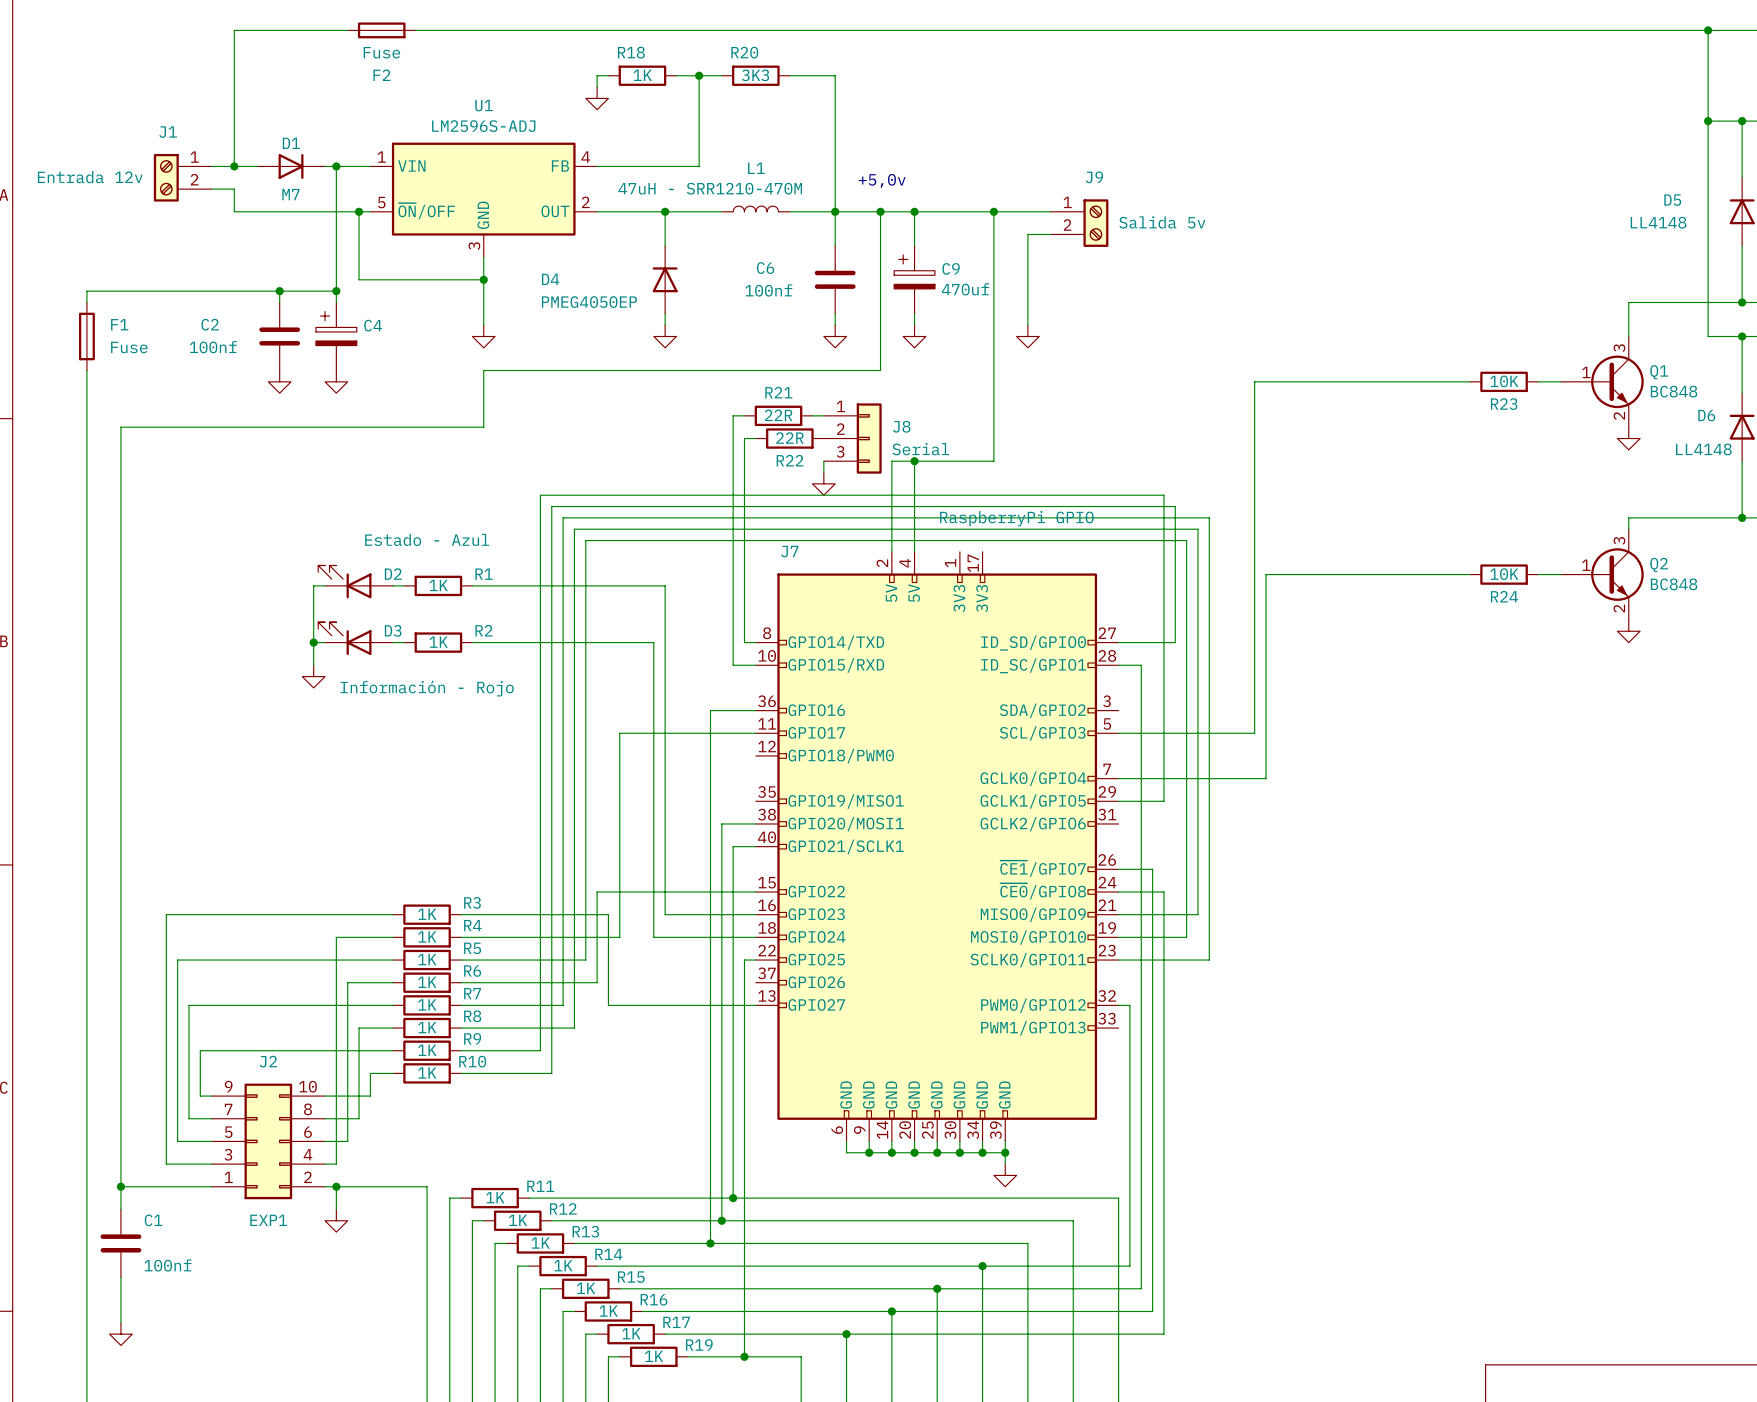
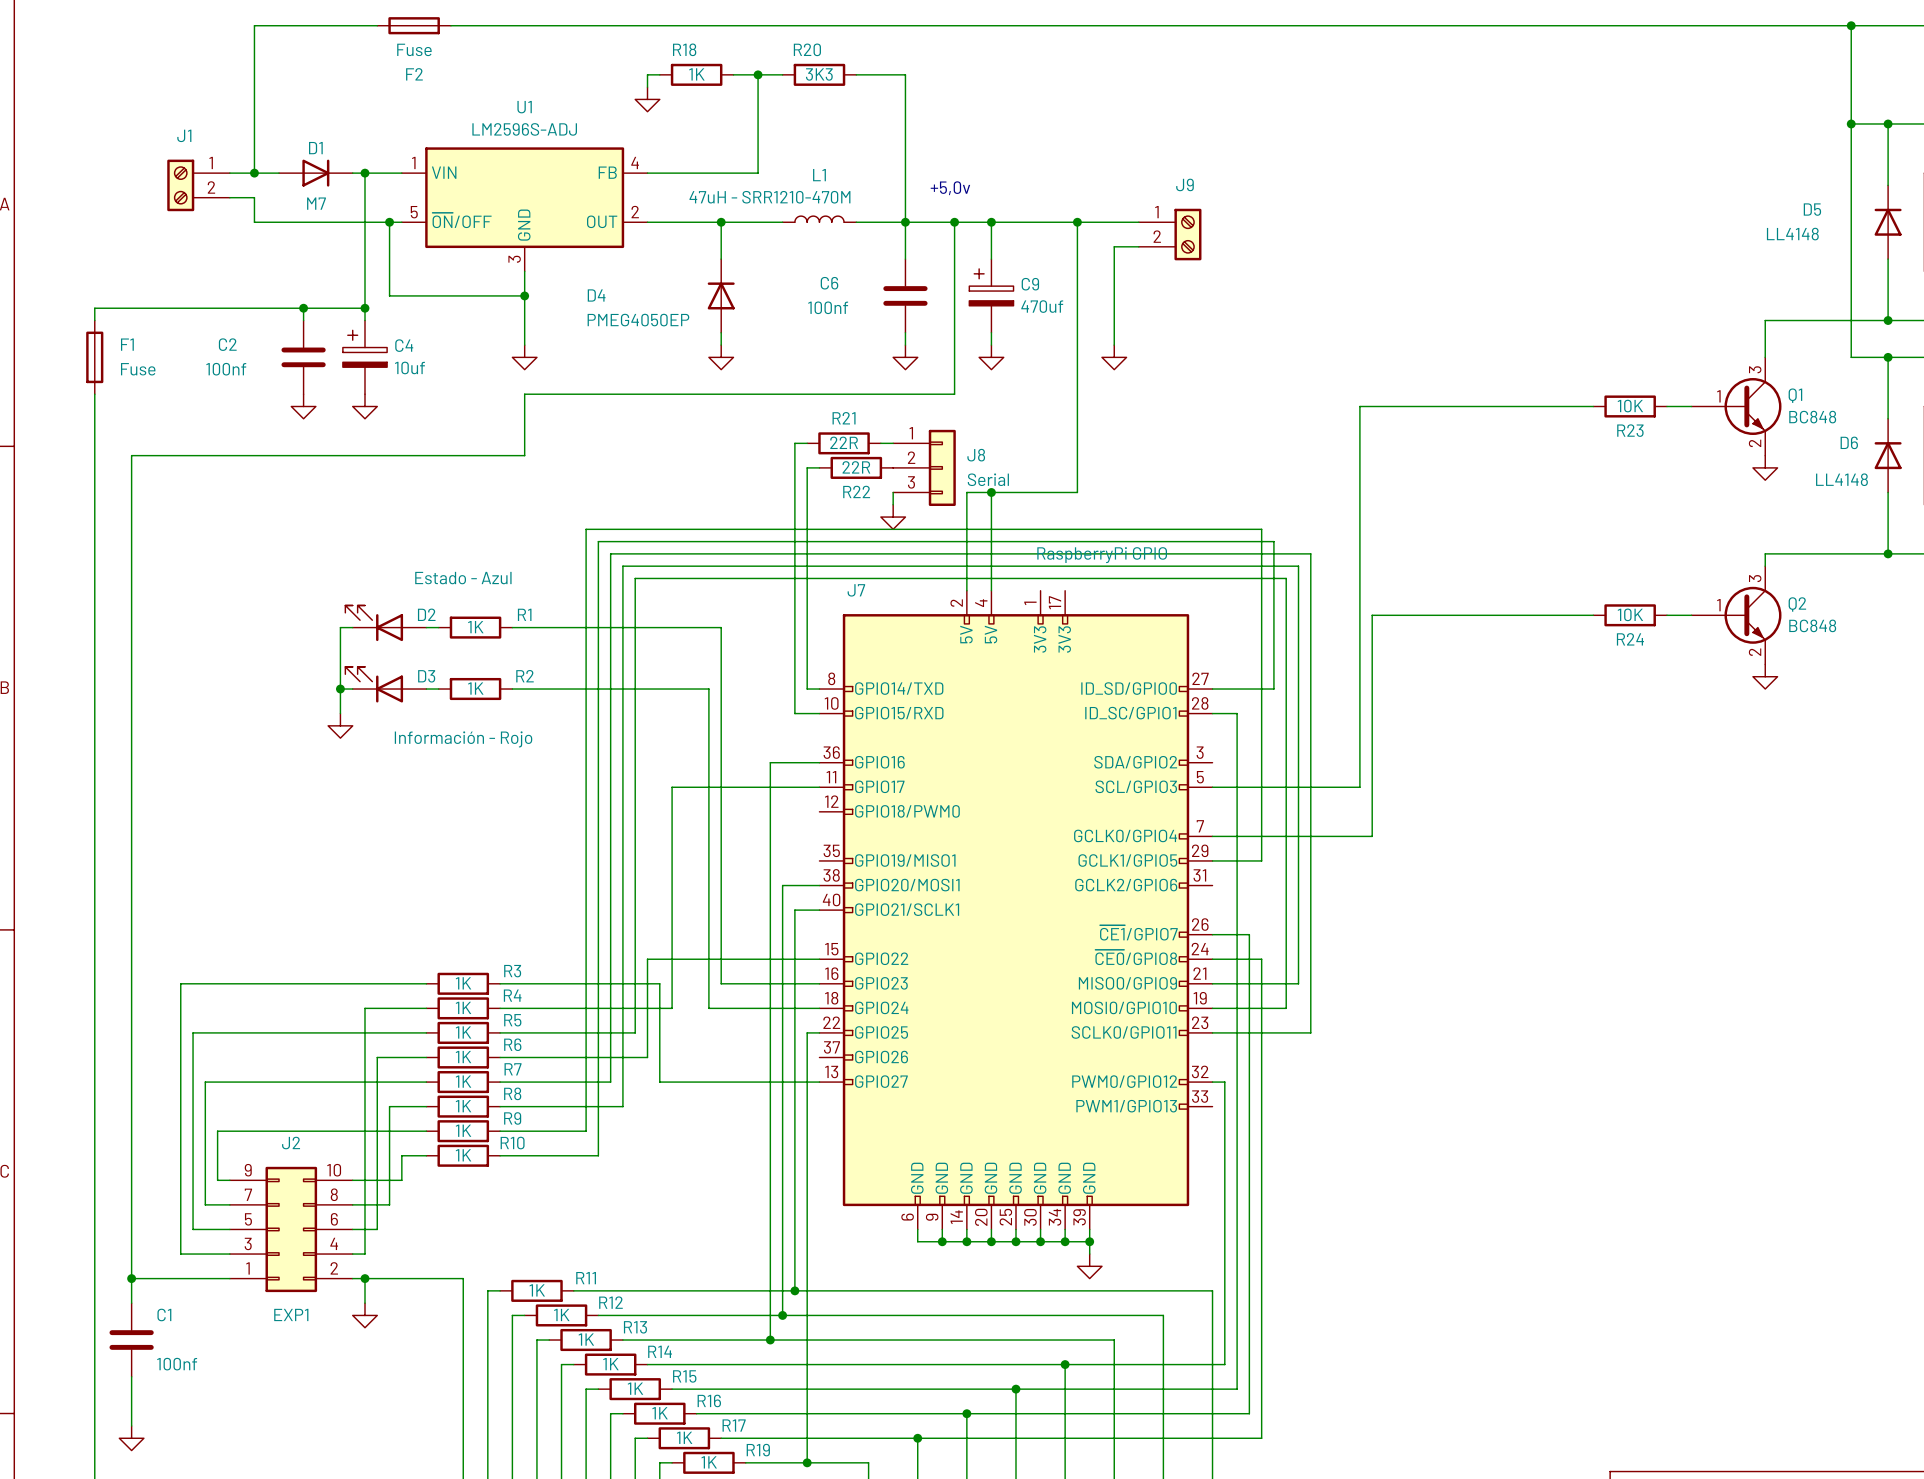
J1 value: Entrada 12v (90, 177) -> none
J9 value: Salida 5v (1162, 222) -> none
C4 value: none -> 10uf (409, 367)

